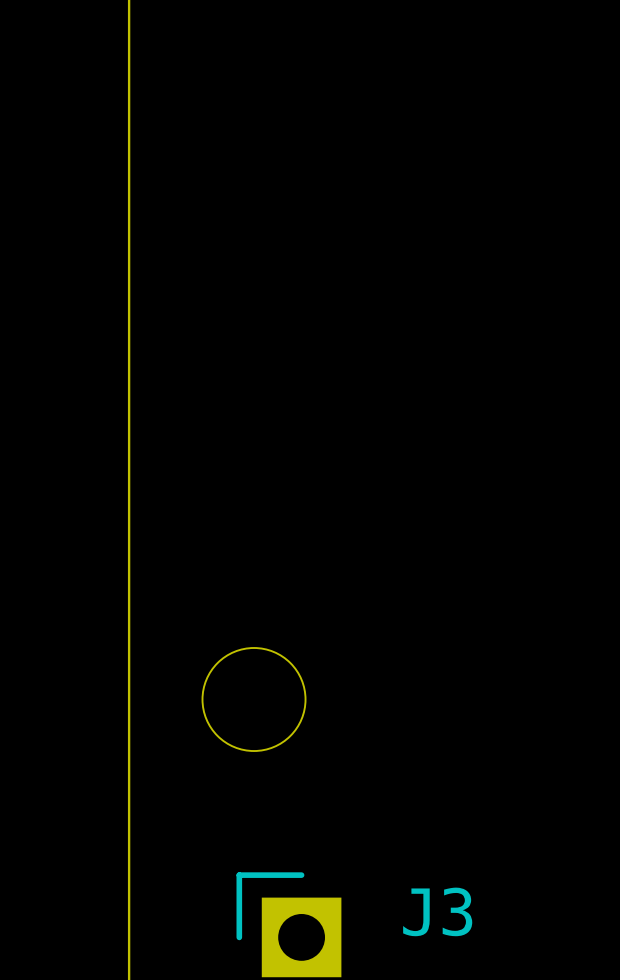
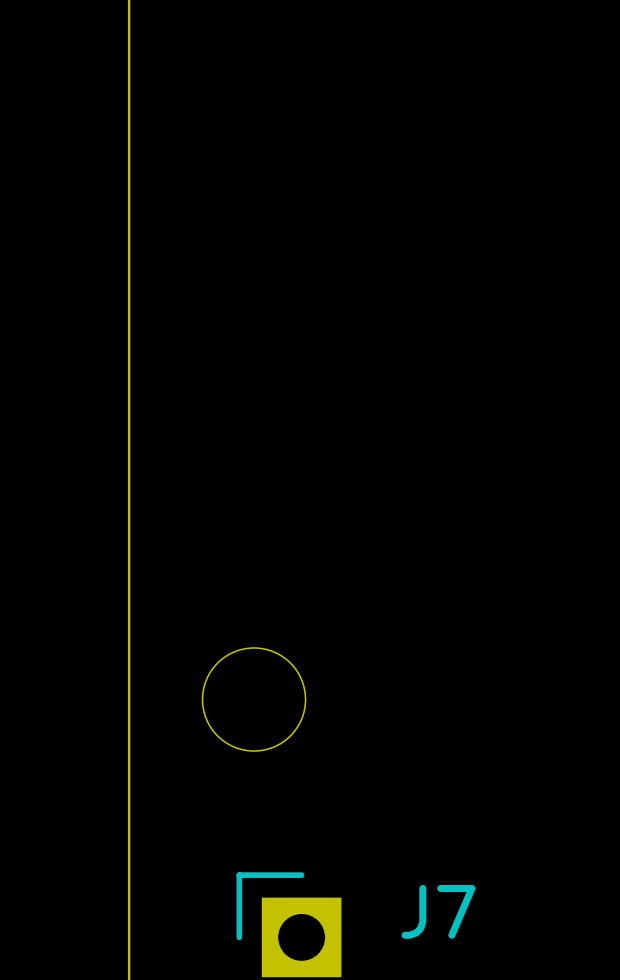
J3 name: J3 (437, 911) -> J7 (438, 911)

